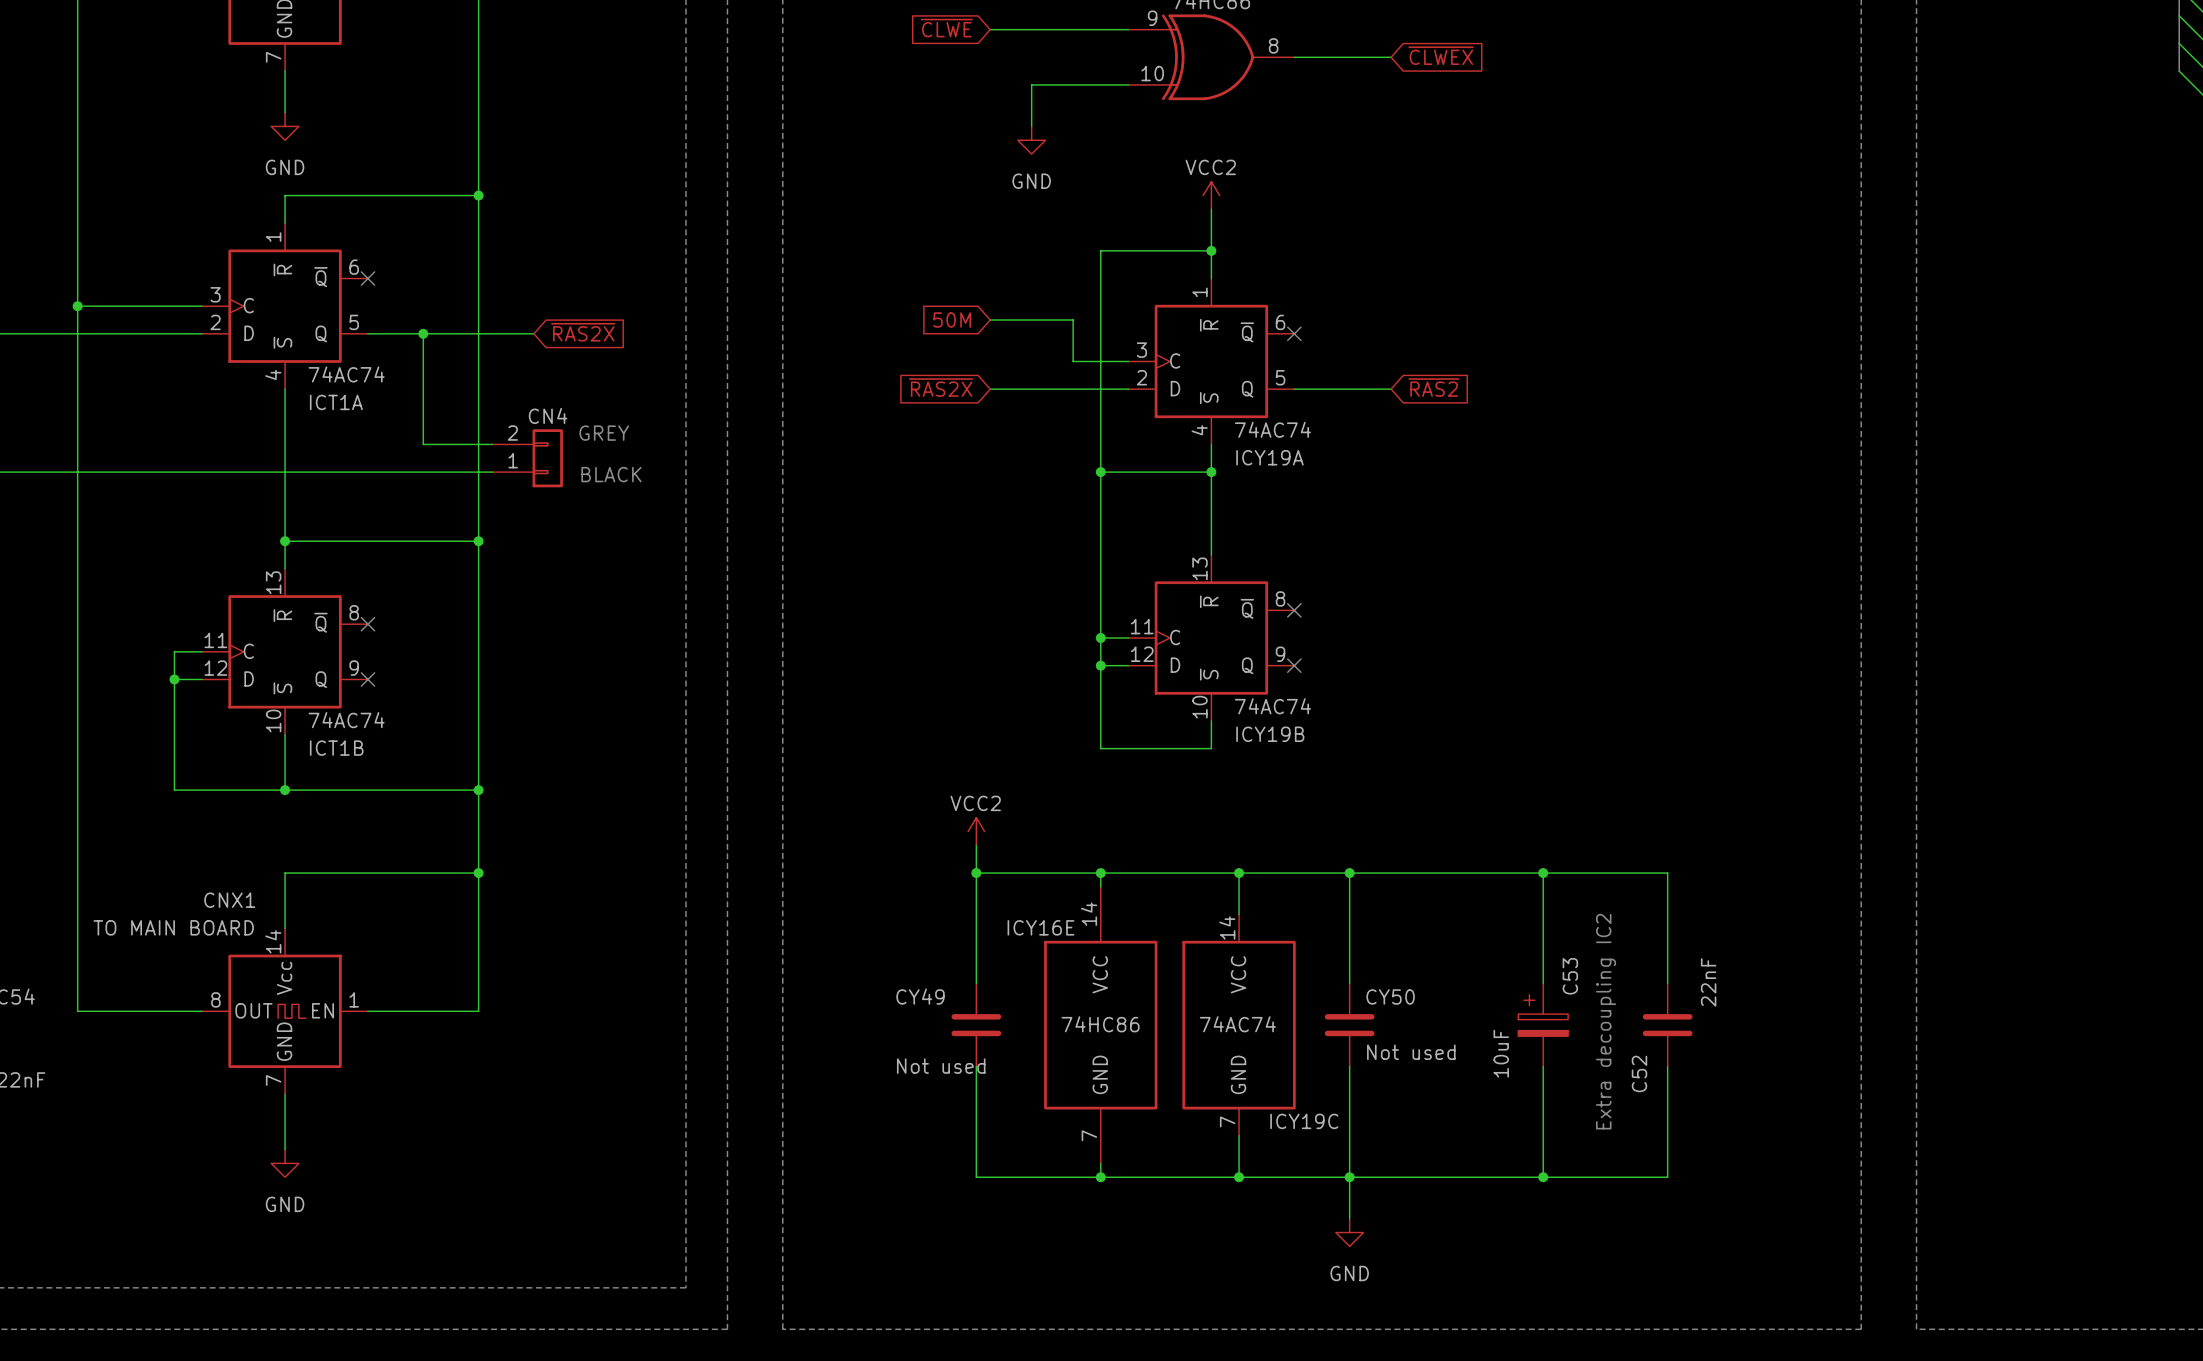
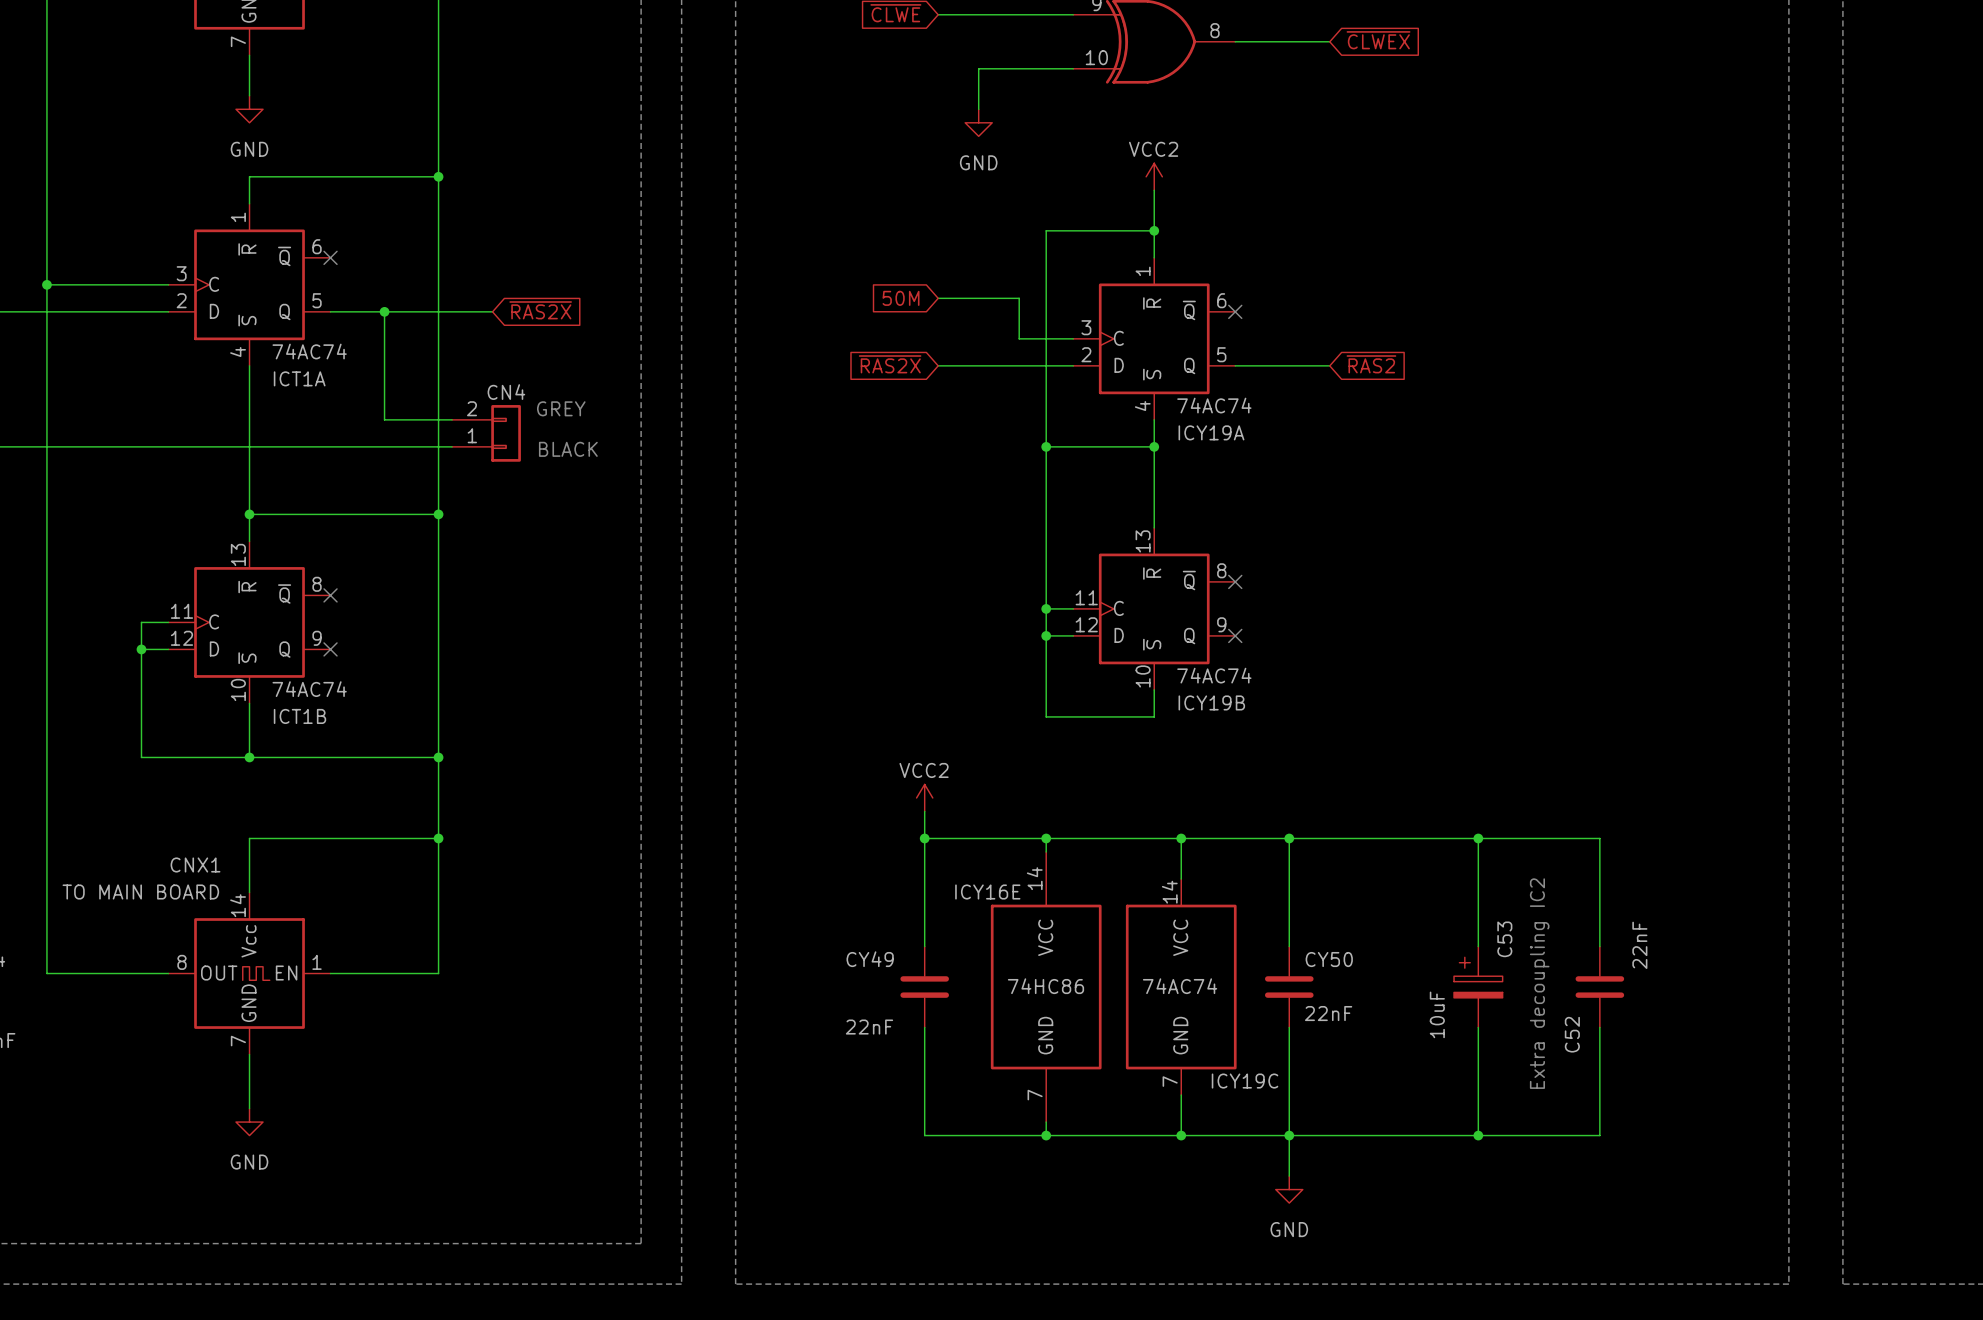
CY50 value: Not used (1411, 1052) -> 22nF (1328, 1013)
CY49 value: Not used (941, 1066) -> 22nF (869, 1027)

